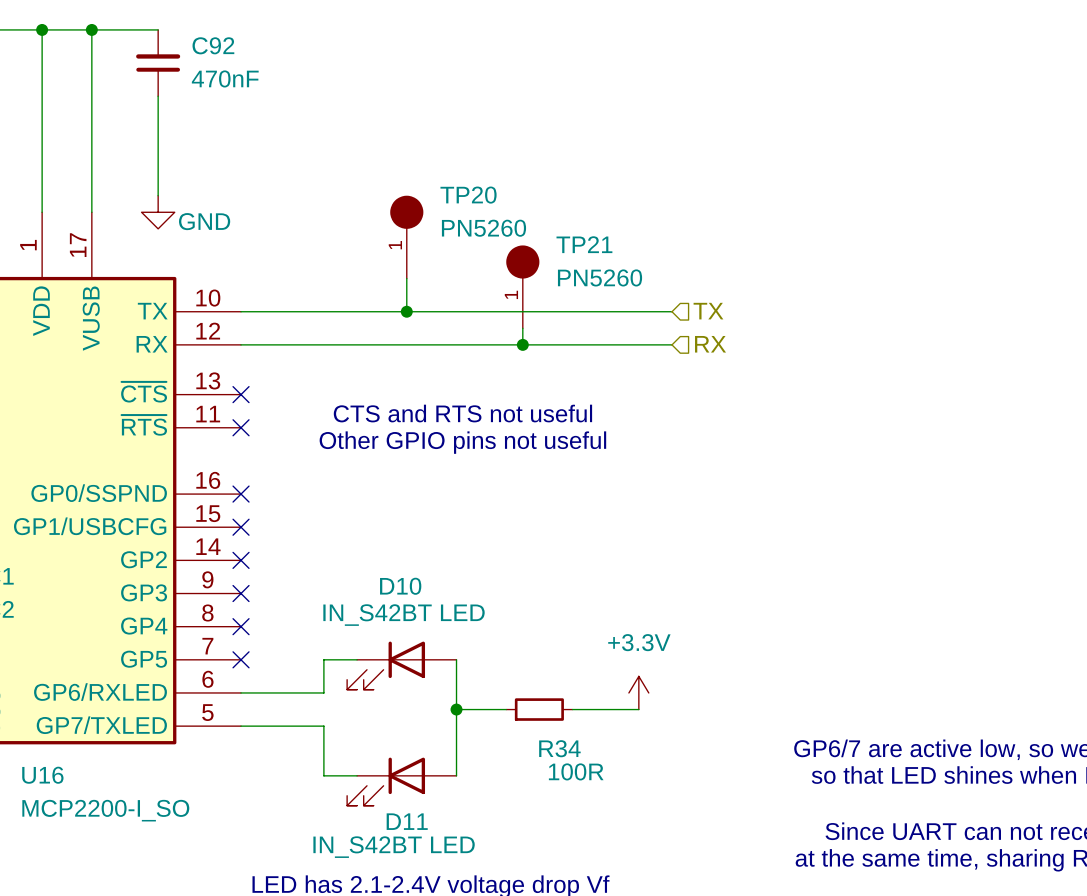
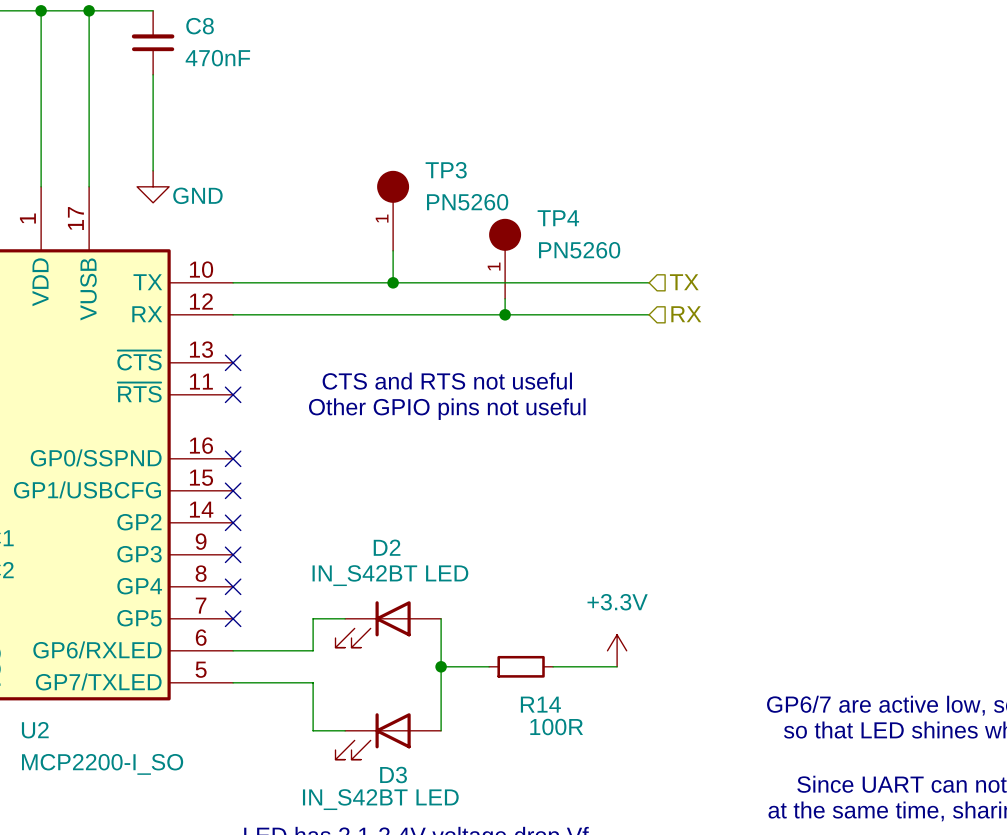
C92 name: C92 (213, 45) -> C8 (200, 26)
TP20 name: TP20 (468, 195) -> TP3 (446, 170)
TP21 name: TP21 (584, 244) -> TP4 (558, 218)
D10 name: D10 (400, 586) -> D2 (387, 547)
R34 name: R34 (559, 748) -> R14 (540, 704)
U16 name: U16 (42, 775) -> U2 (35, 730)
D11 name: D11 (407, 821) -> D3 (393, 775)

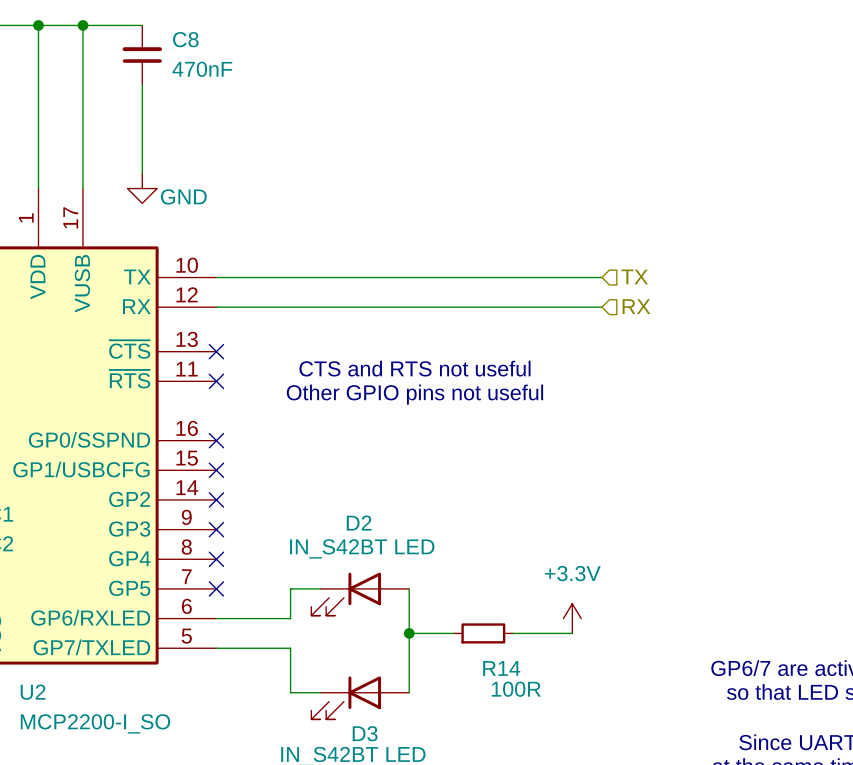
TP3: PN5260 (393, 210) -> none
wire: (393, 250) (393, 282) -> none
TP4: PN5260 (505, 258) -> none
junction: (393, 282) -> none
wire: (505, 298) (505, 314) -> none
junction: (505, 314) -> none

